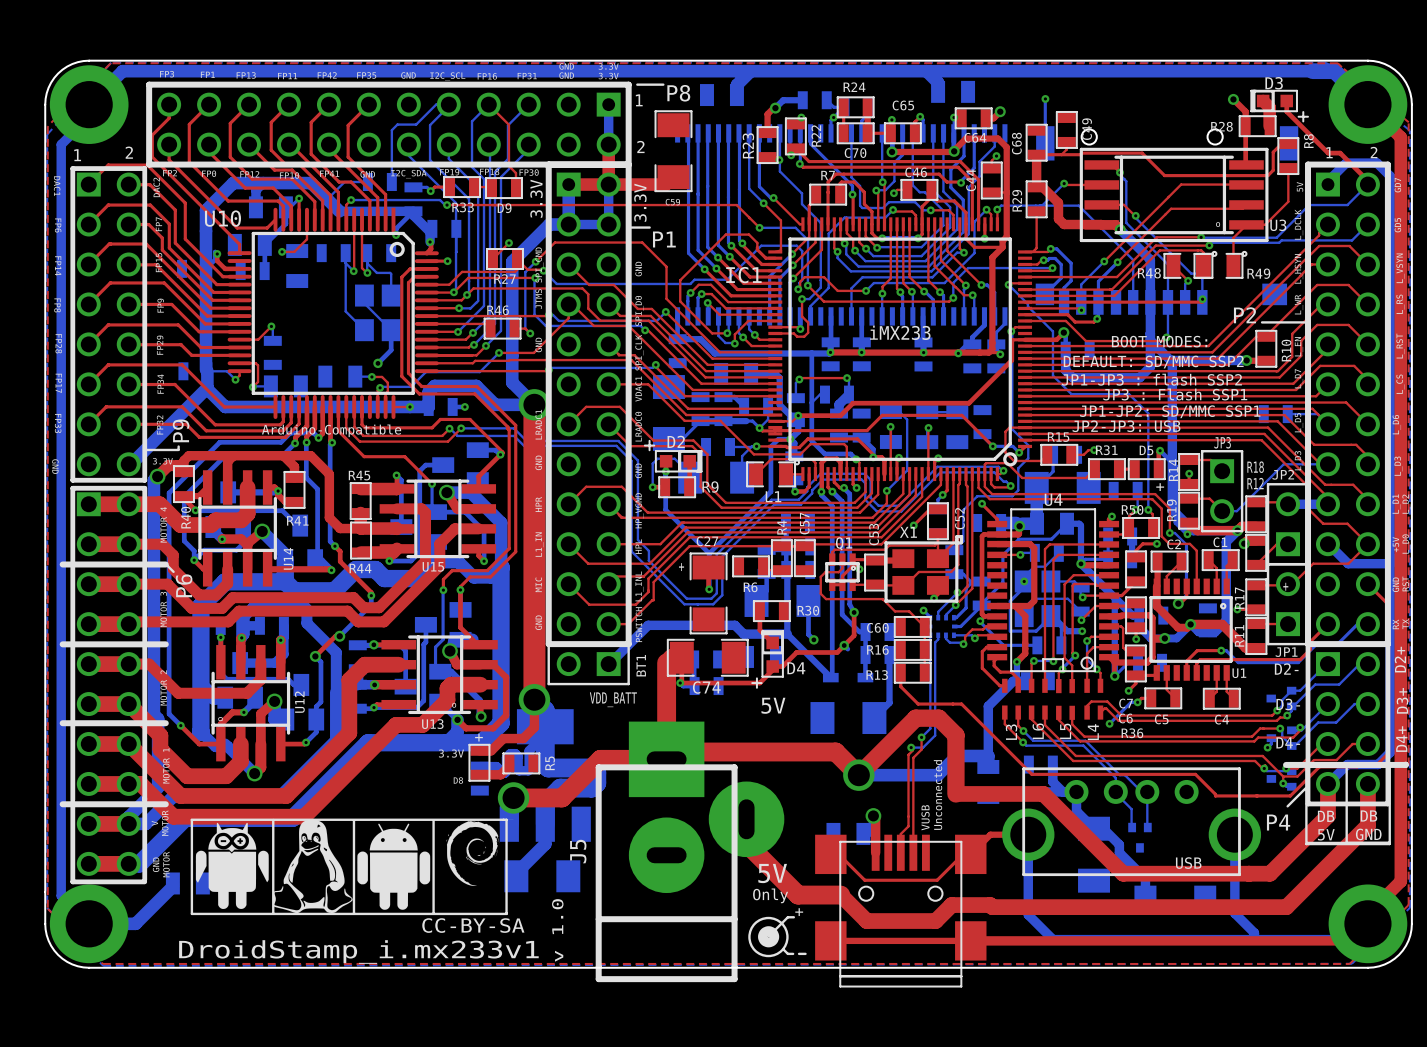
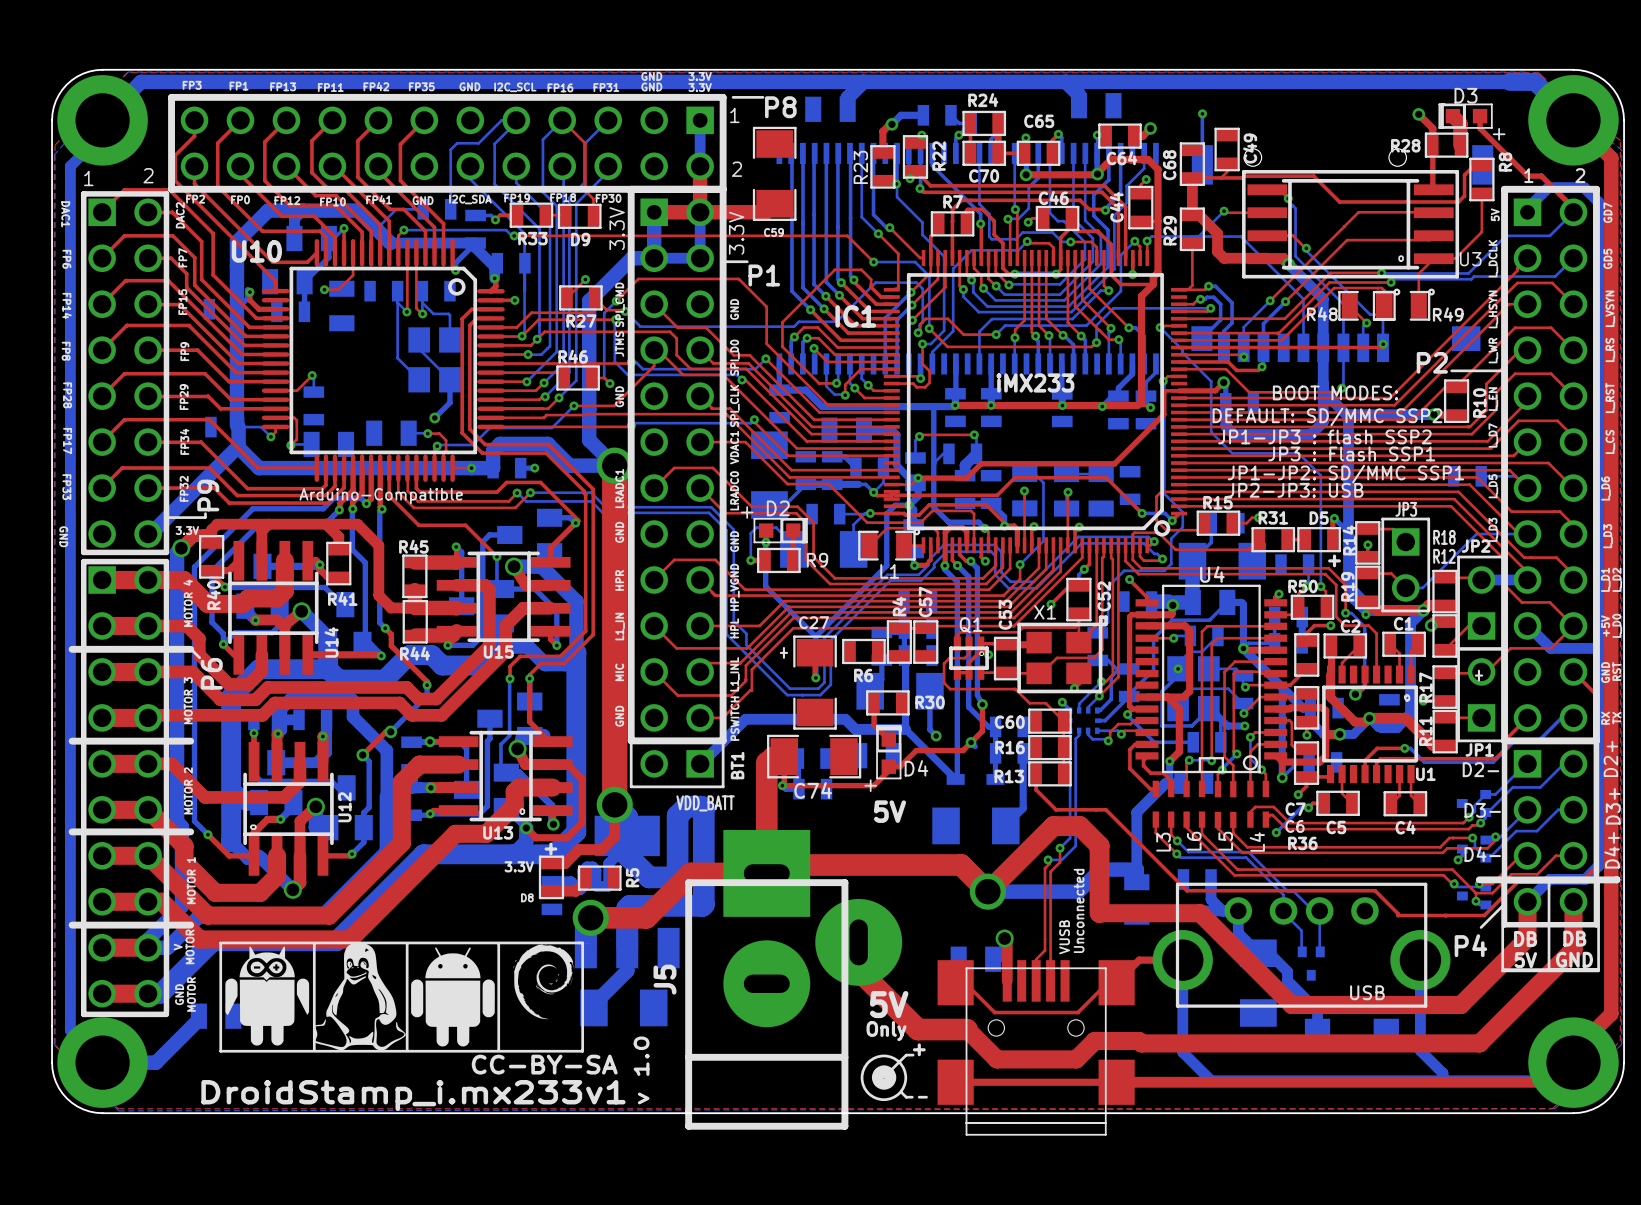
bottom track: (545, 743) (545, 764) (548, 767) (592, 767) (596, 772) (596, 783) (591, 788) (560, 788) (545, 803) -> (627, 855) (649, 877) (673, 877) (677, 872) (677, 815) (686, 806) (701, 806) (703, 809) (703, 904) (629, 905) (627, 908) (627, 923)

